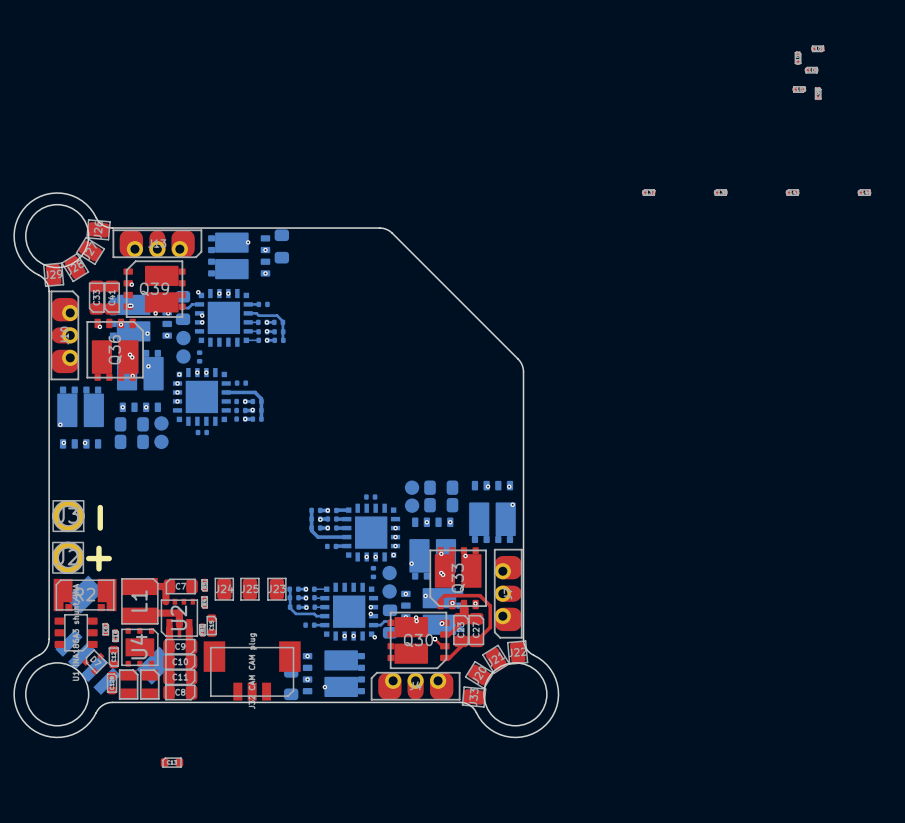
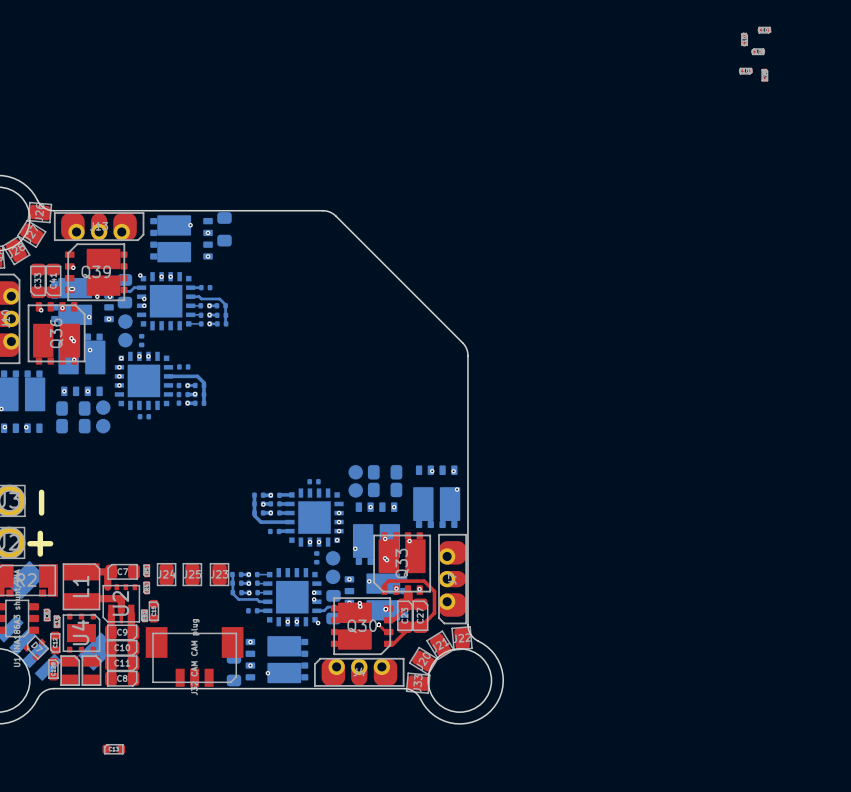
part: (648, 192) -> none
part: (720, 192) -> none
part: (792, 192) -> none
part: (864, 192) -> none

